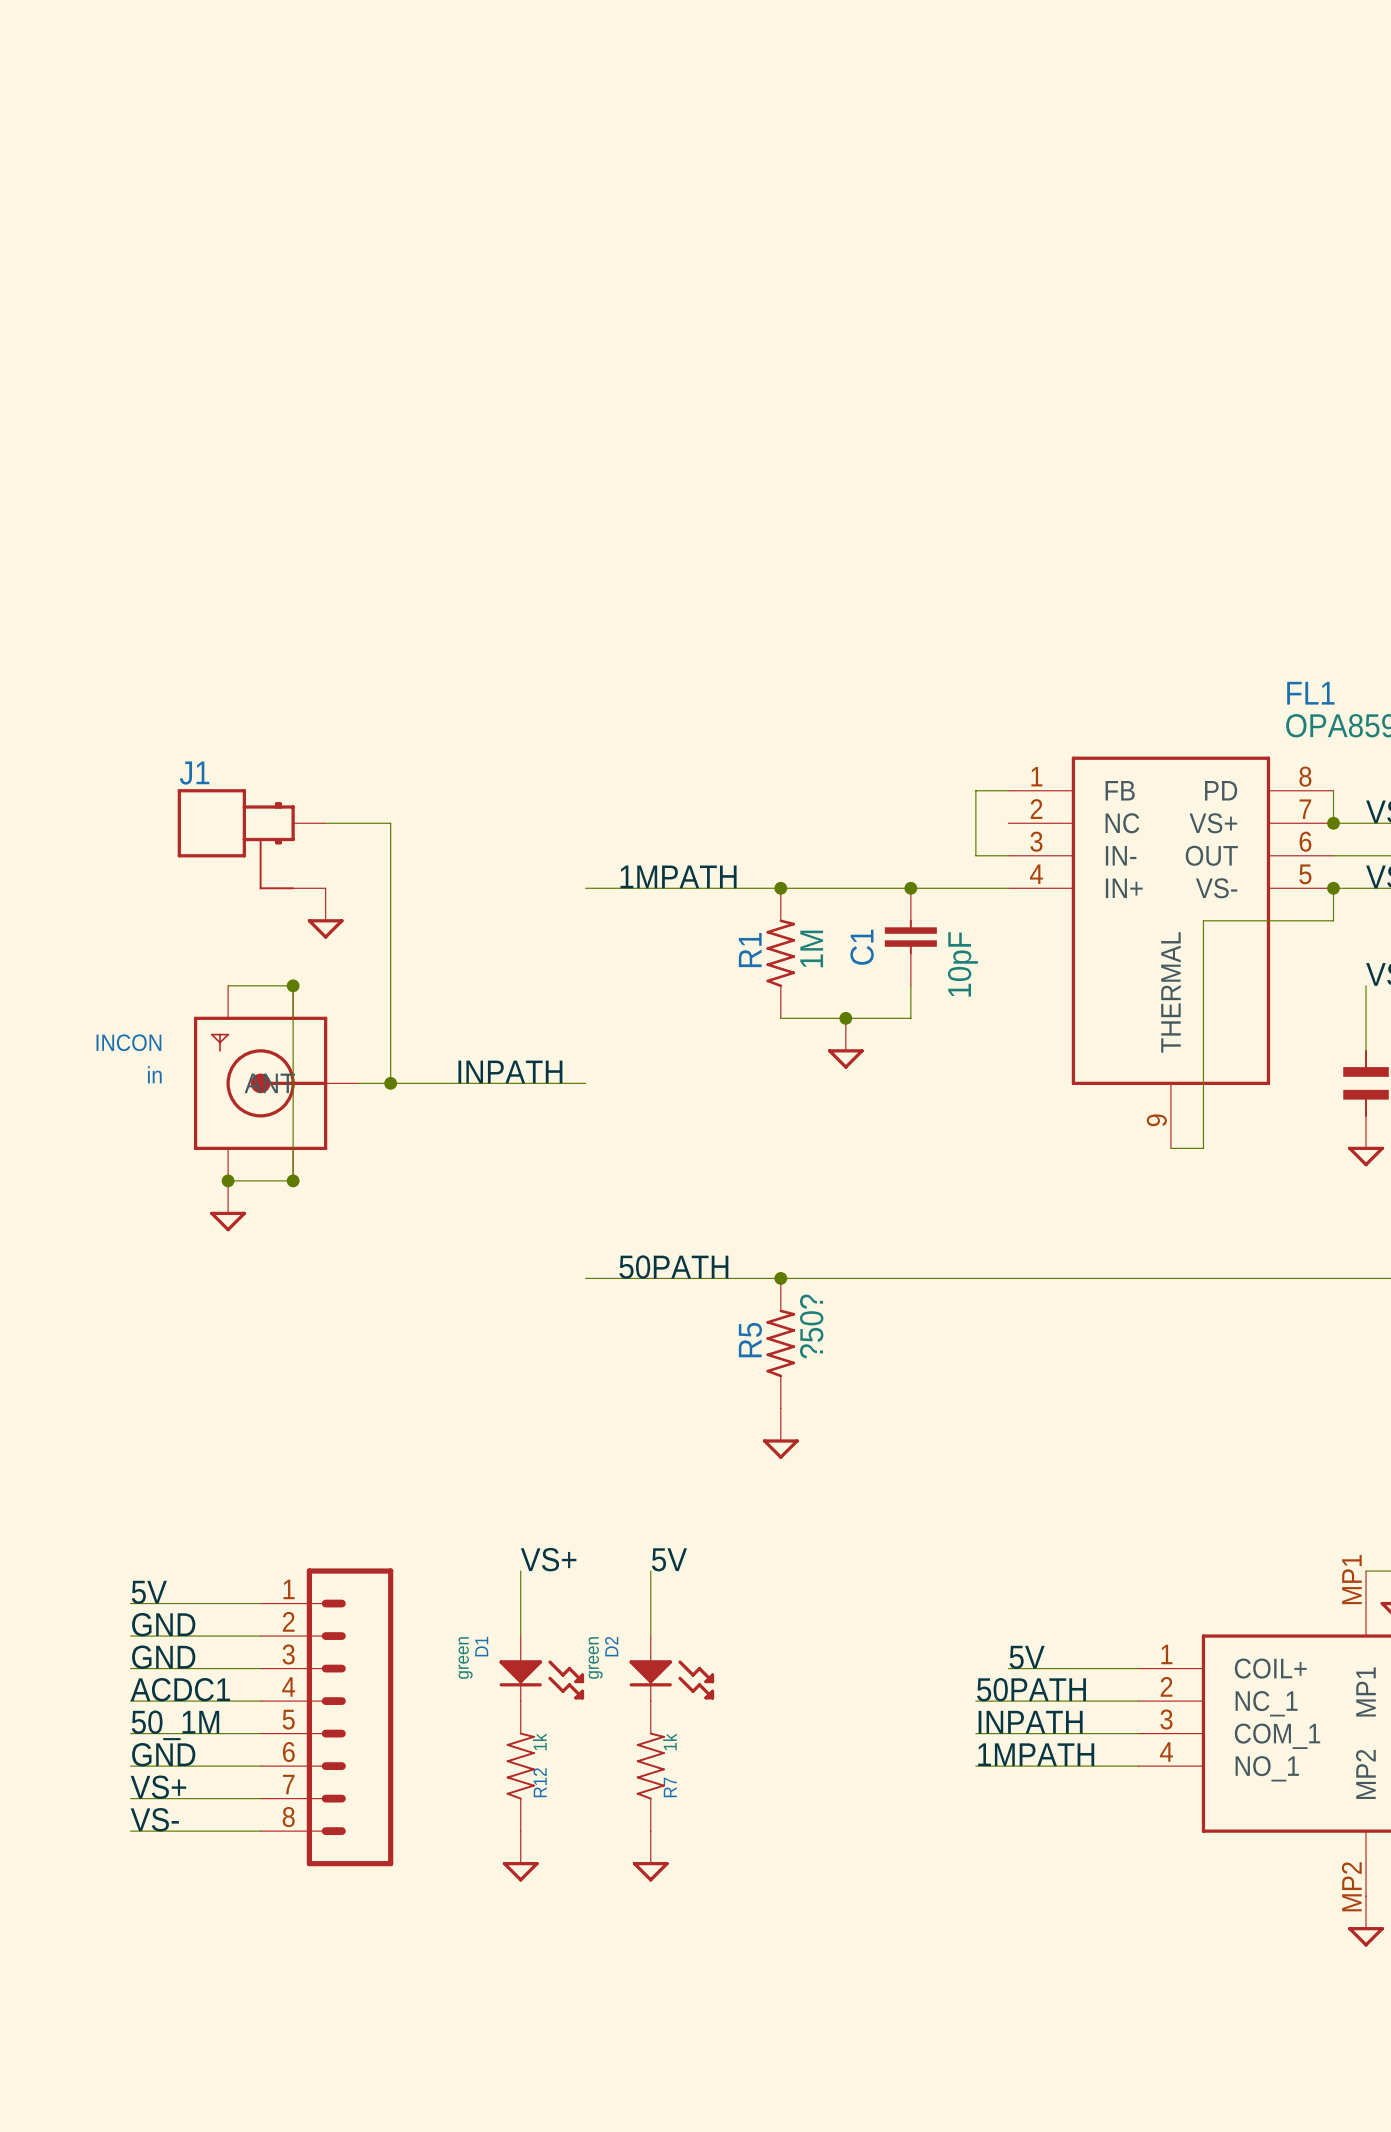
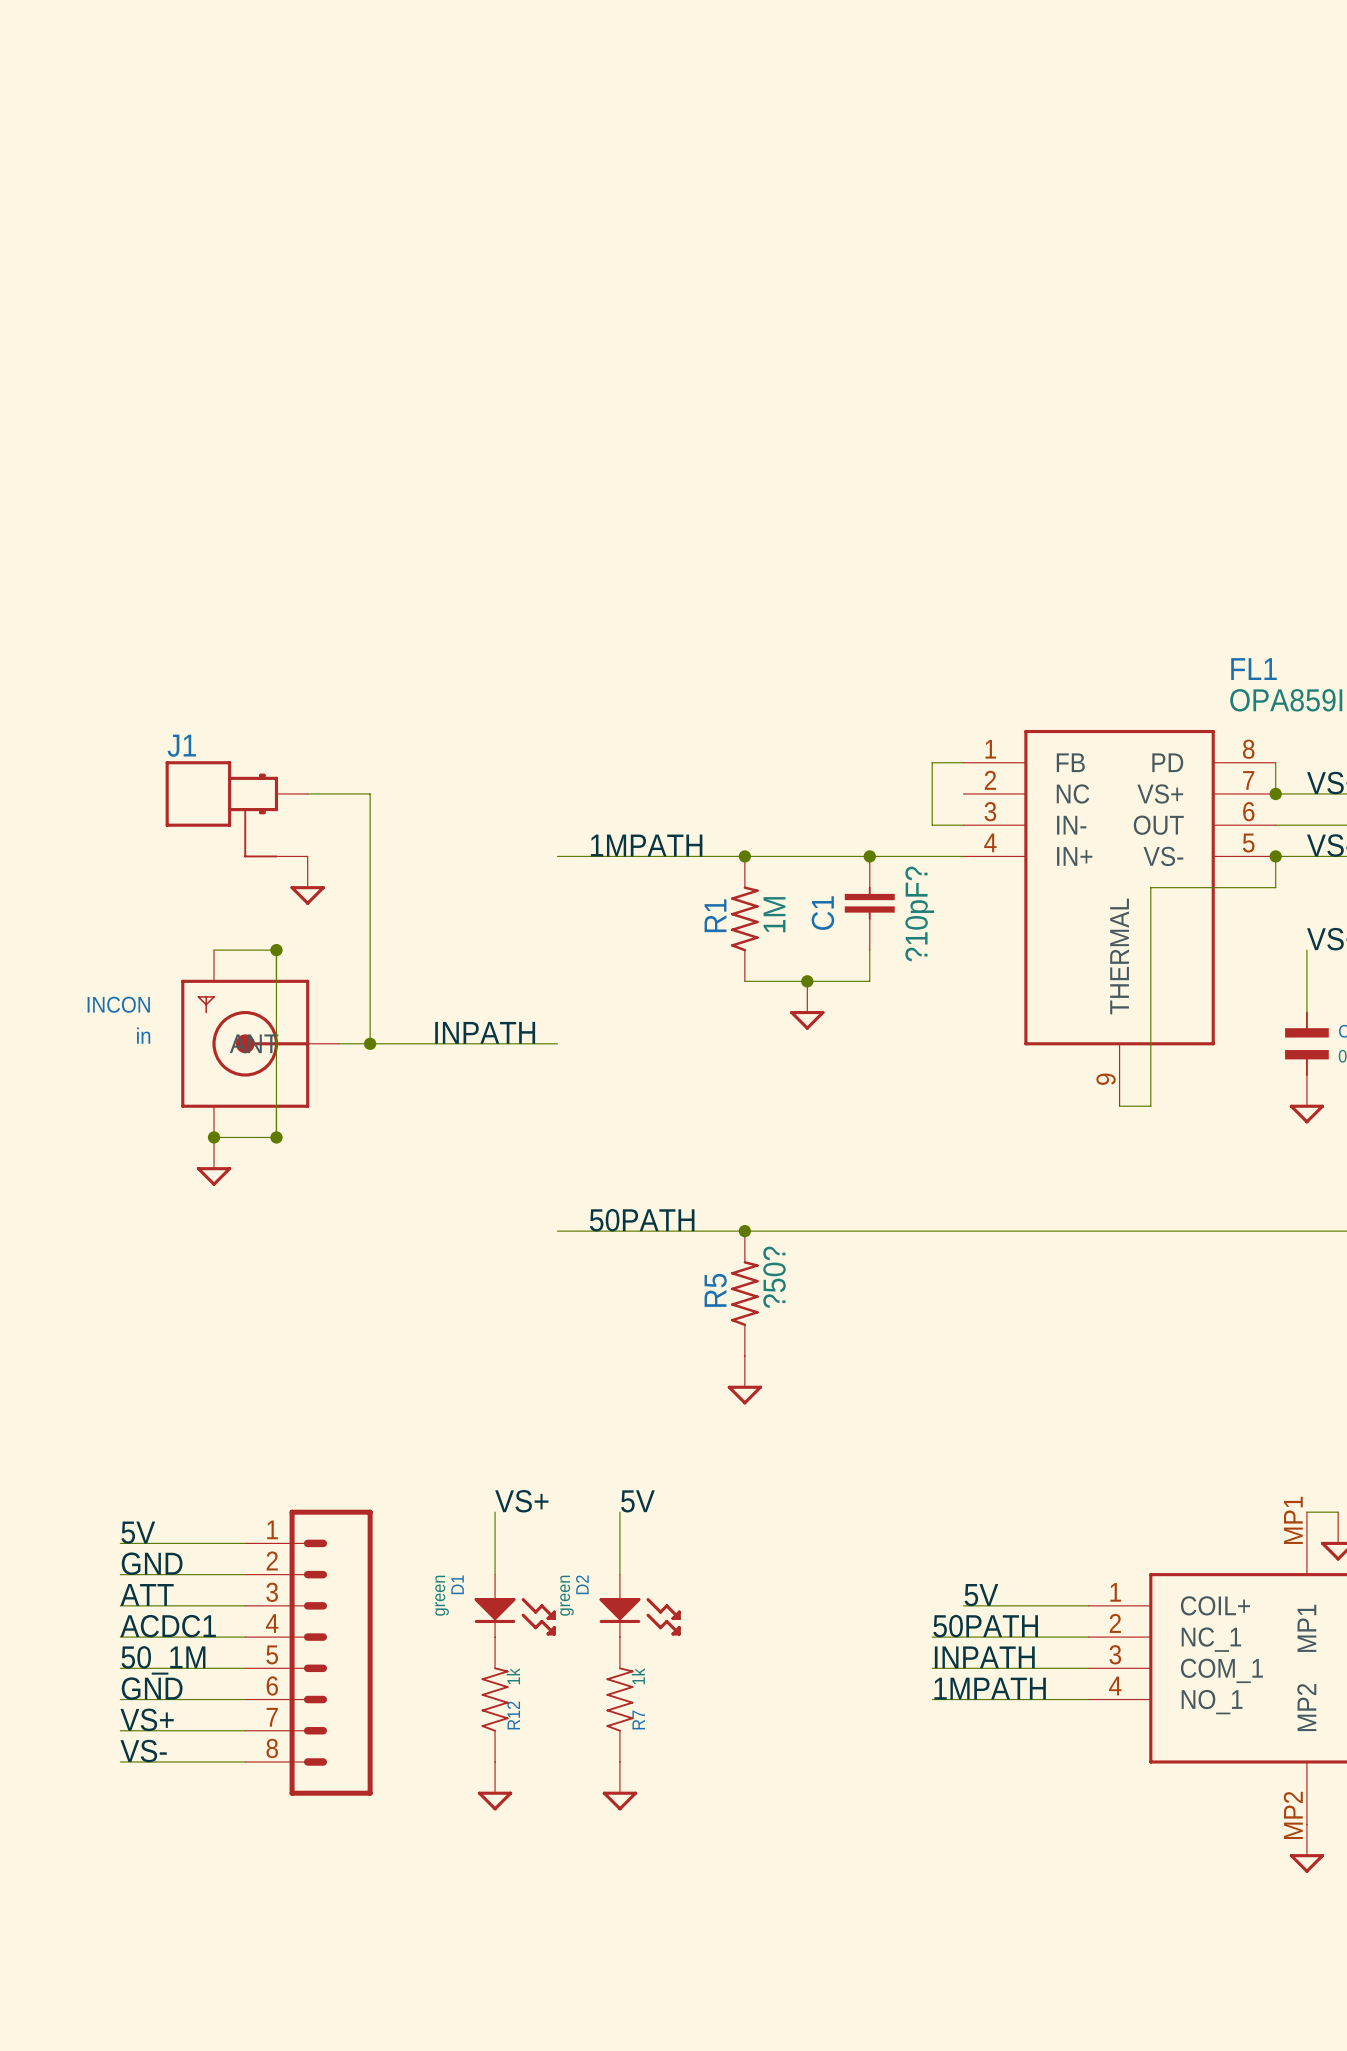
C1 value: 10pF (962, 964) -> ?10pF? (919, 914)
label: GND (163, 1657) -> ATT (147, 1594)

